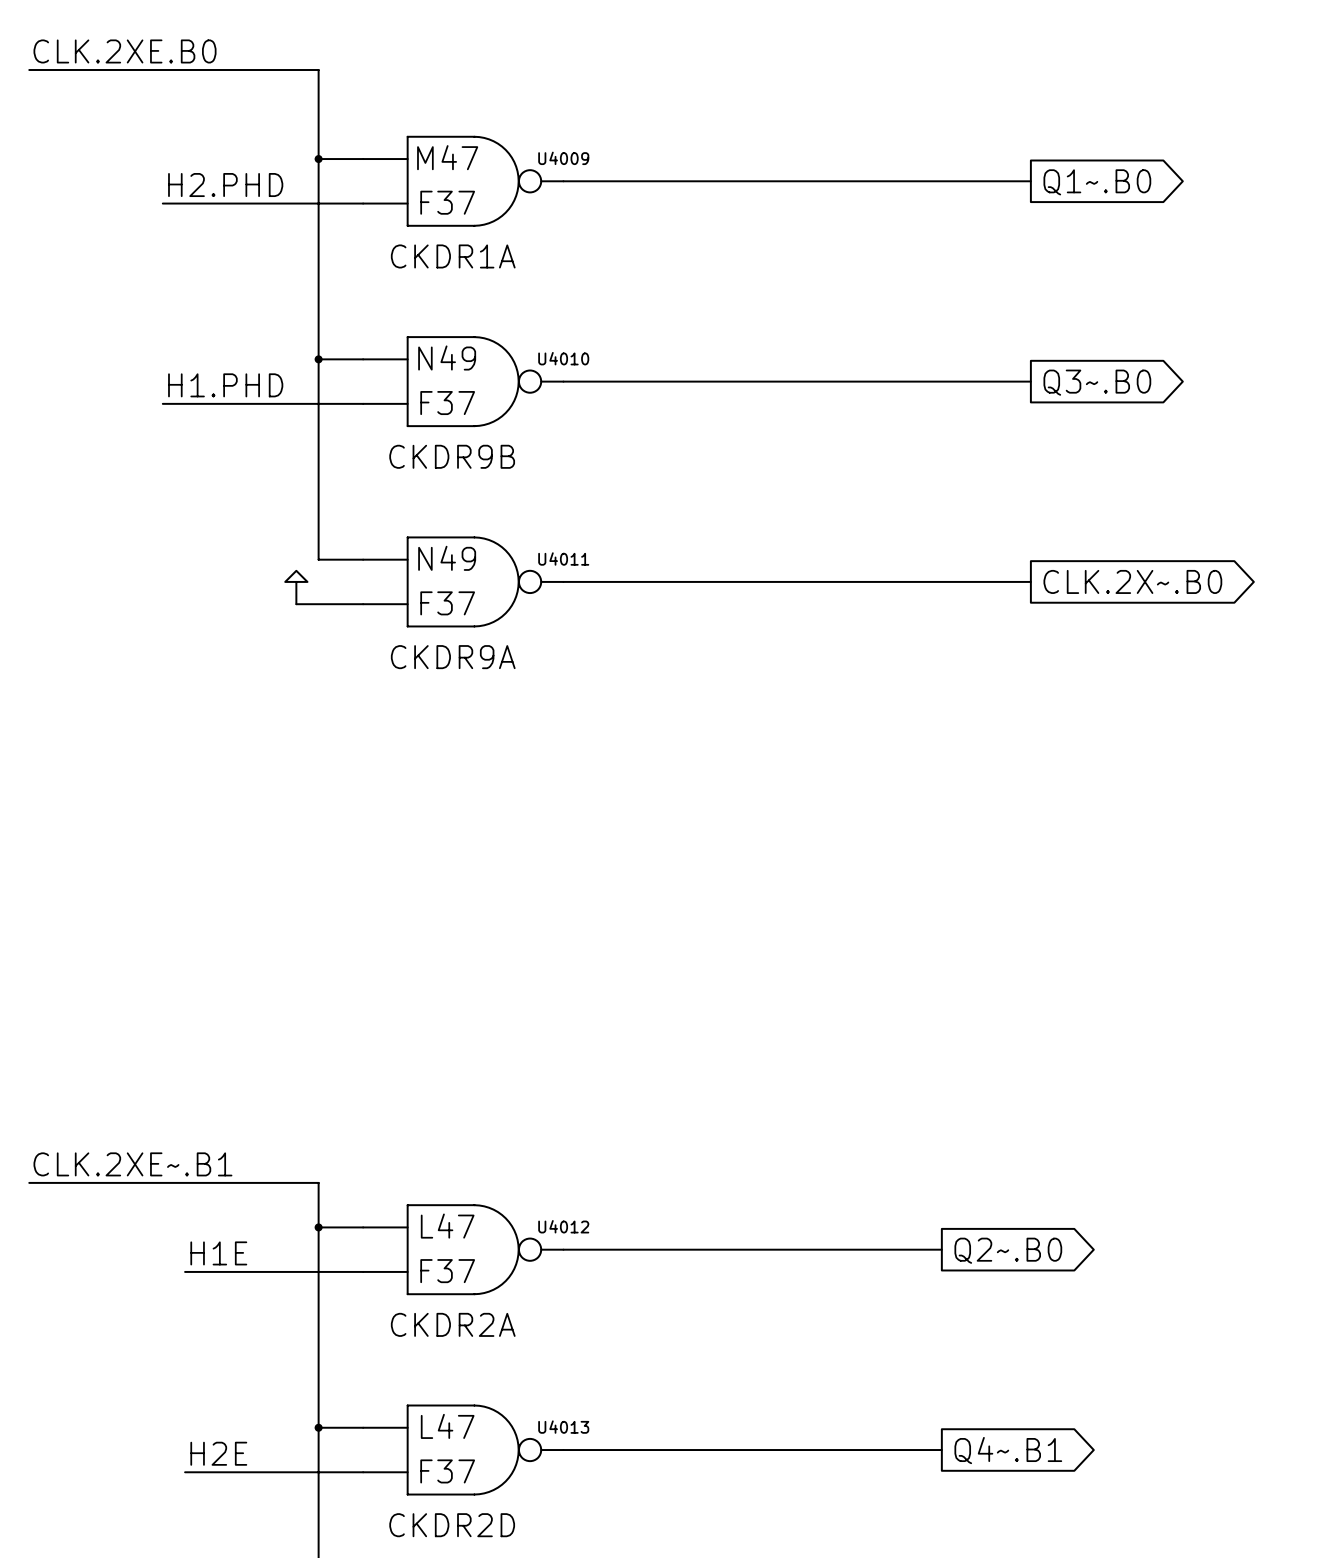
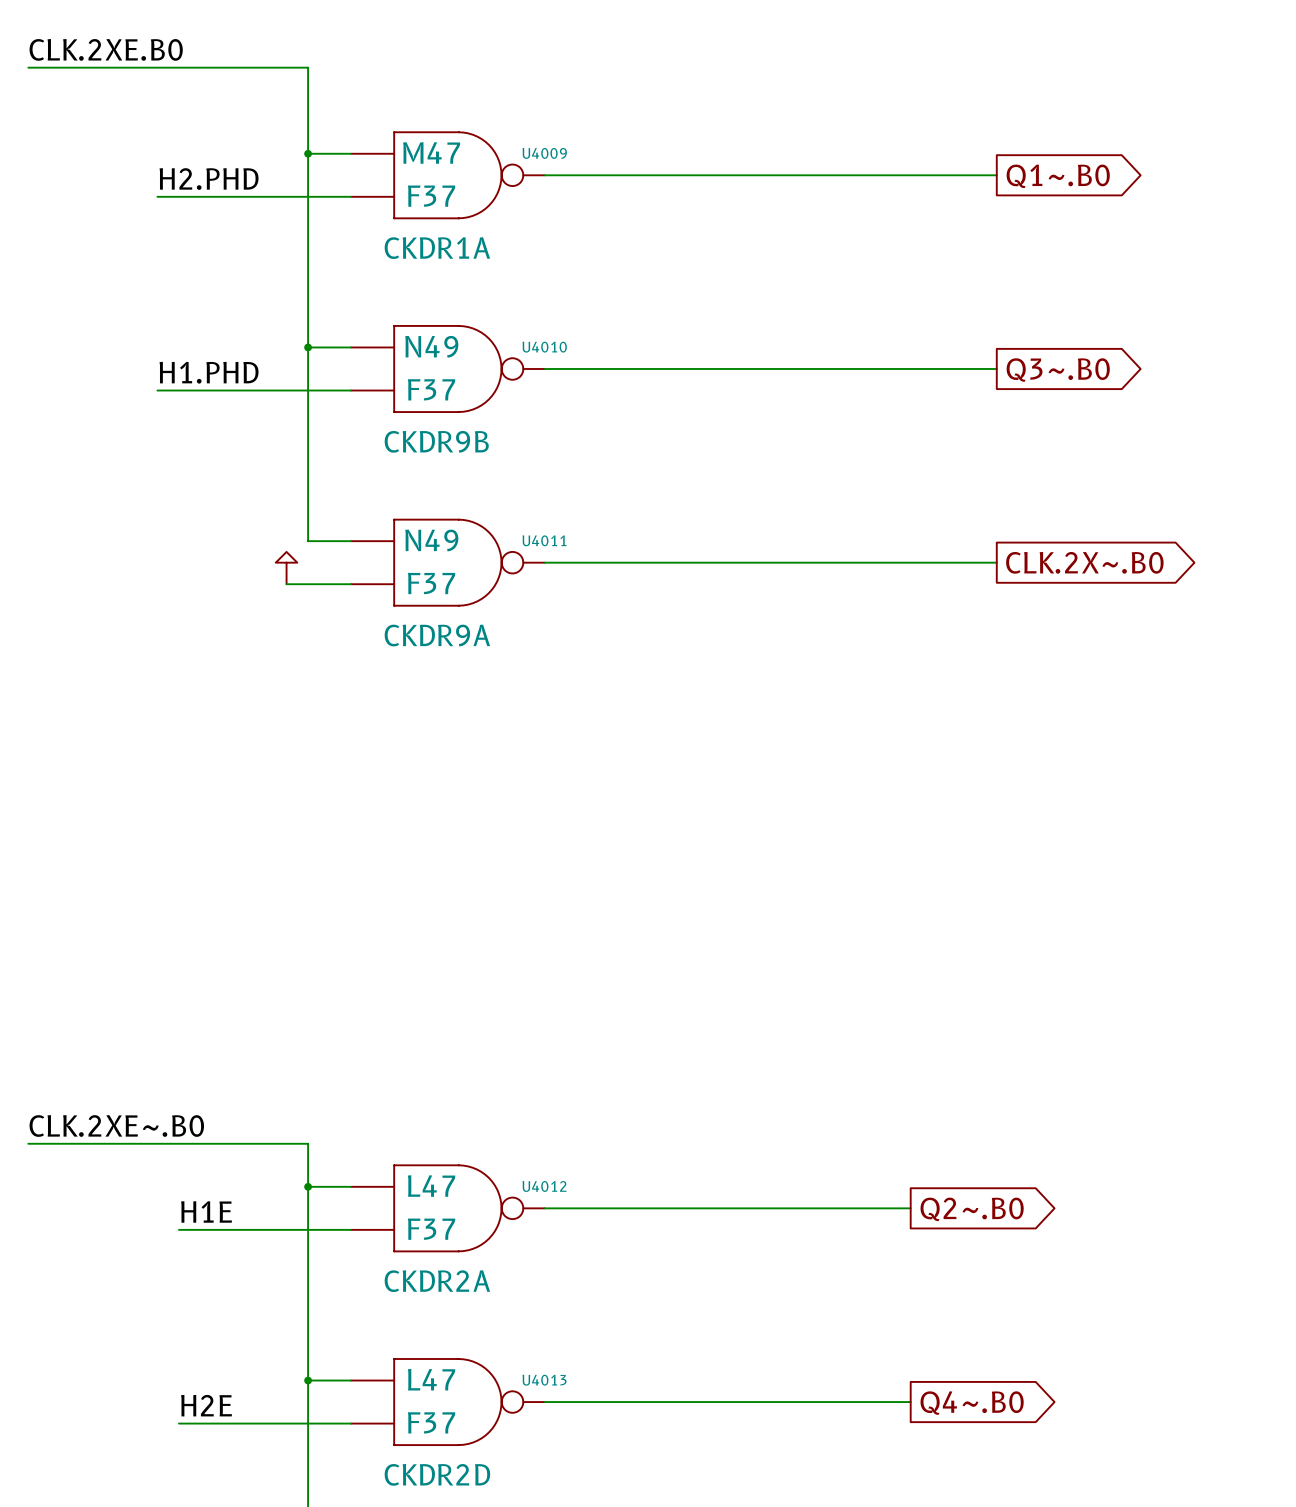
label: CLK.2XE~.B1 (132, 1164) -> CLK.2XE~.B0 (116, 1125)
global label: Q4~.B1 (1008, 1450) -> Q4~.B0 (972, 1403)

